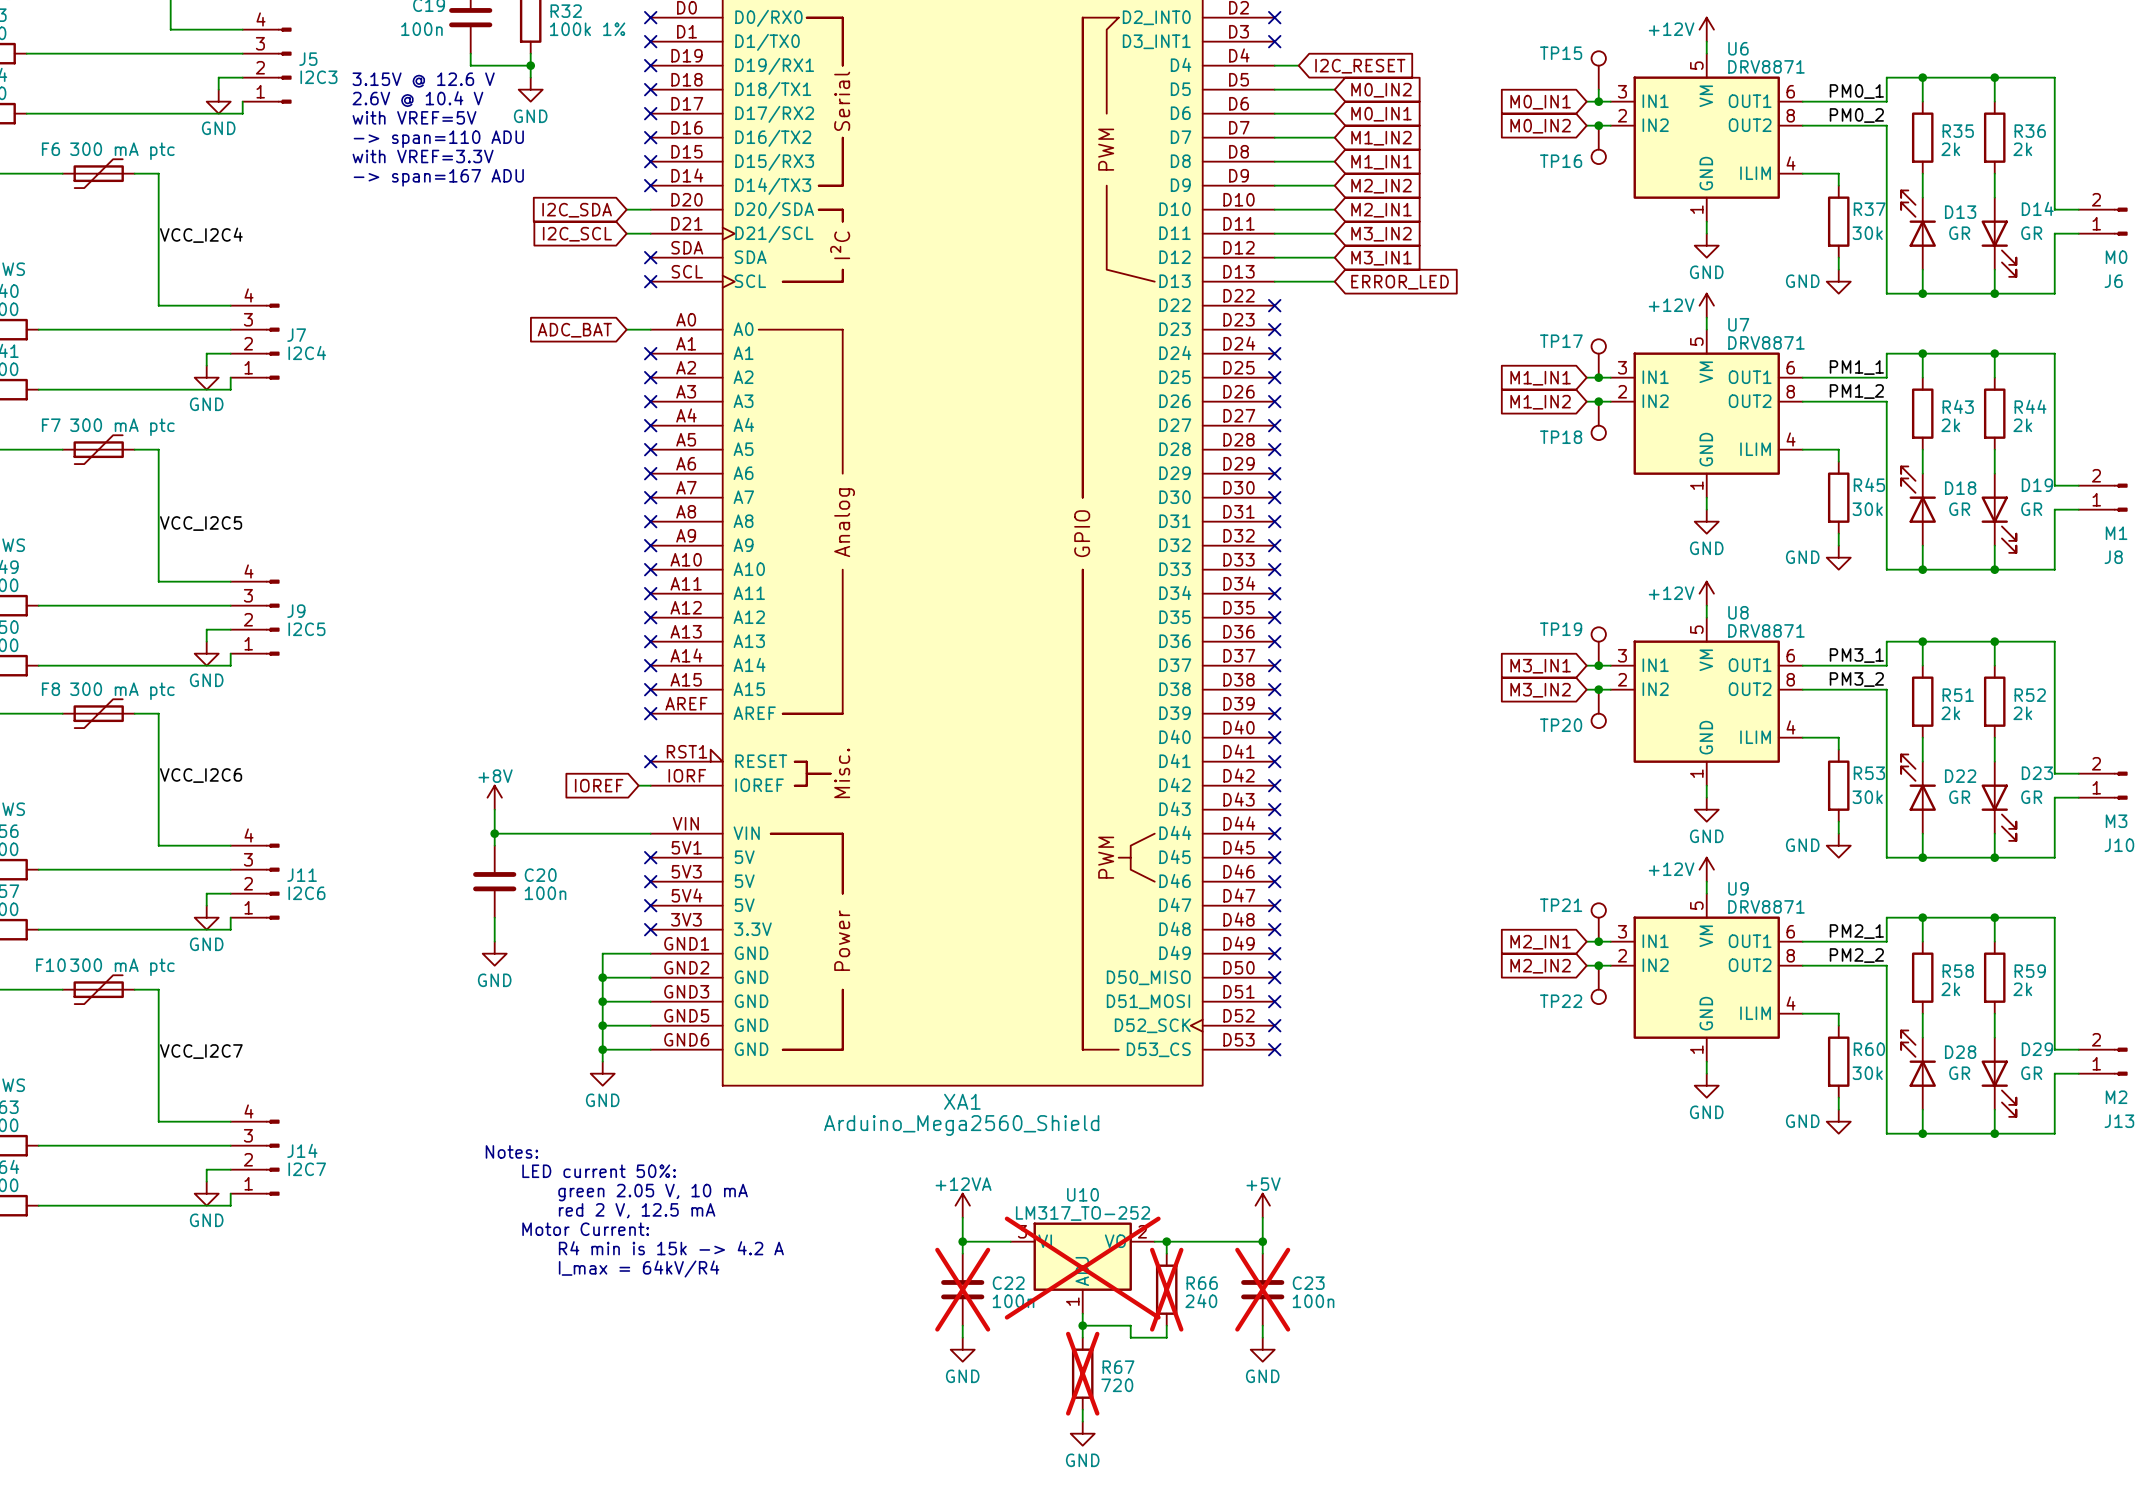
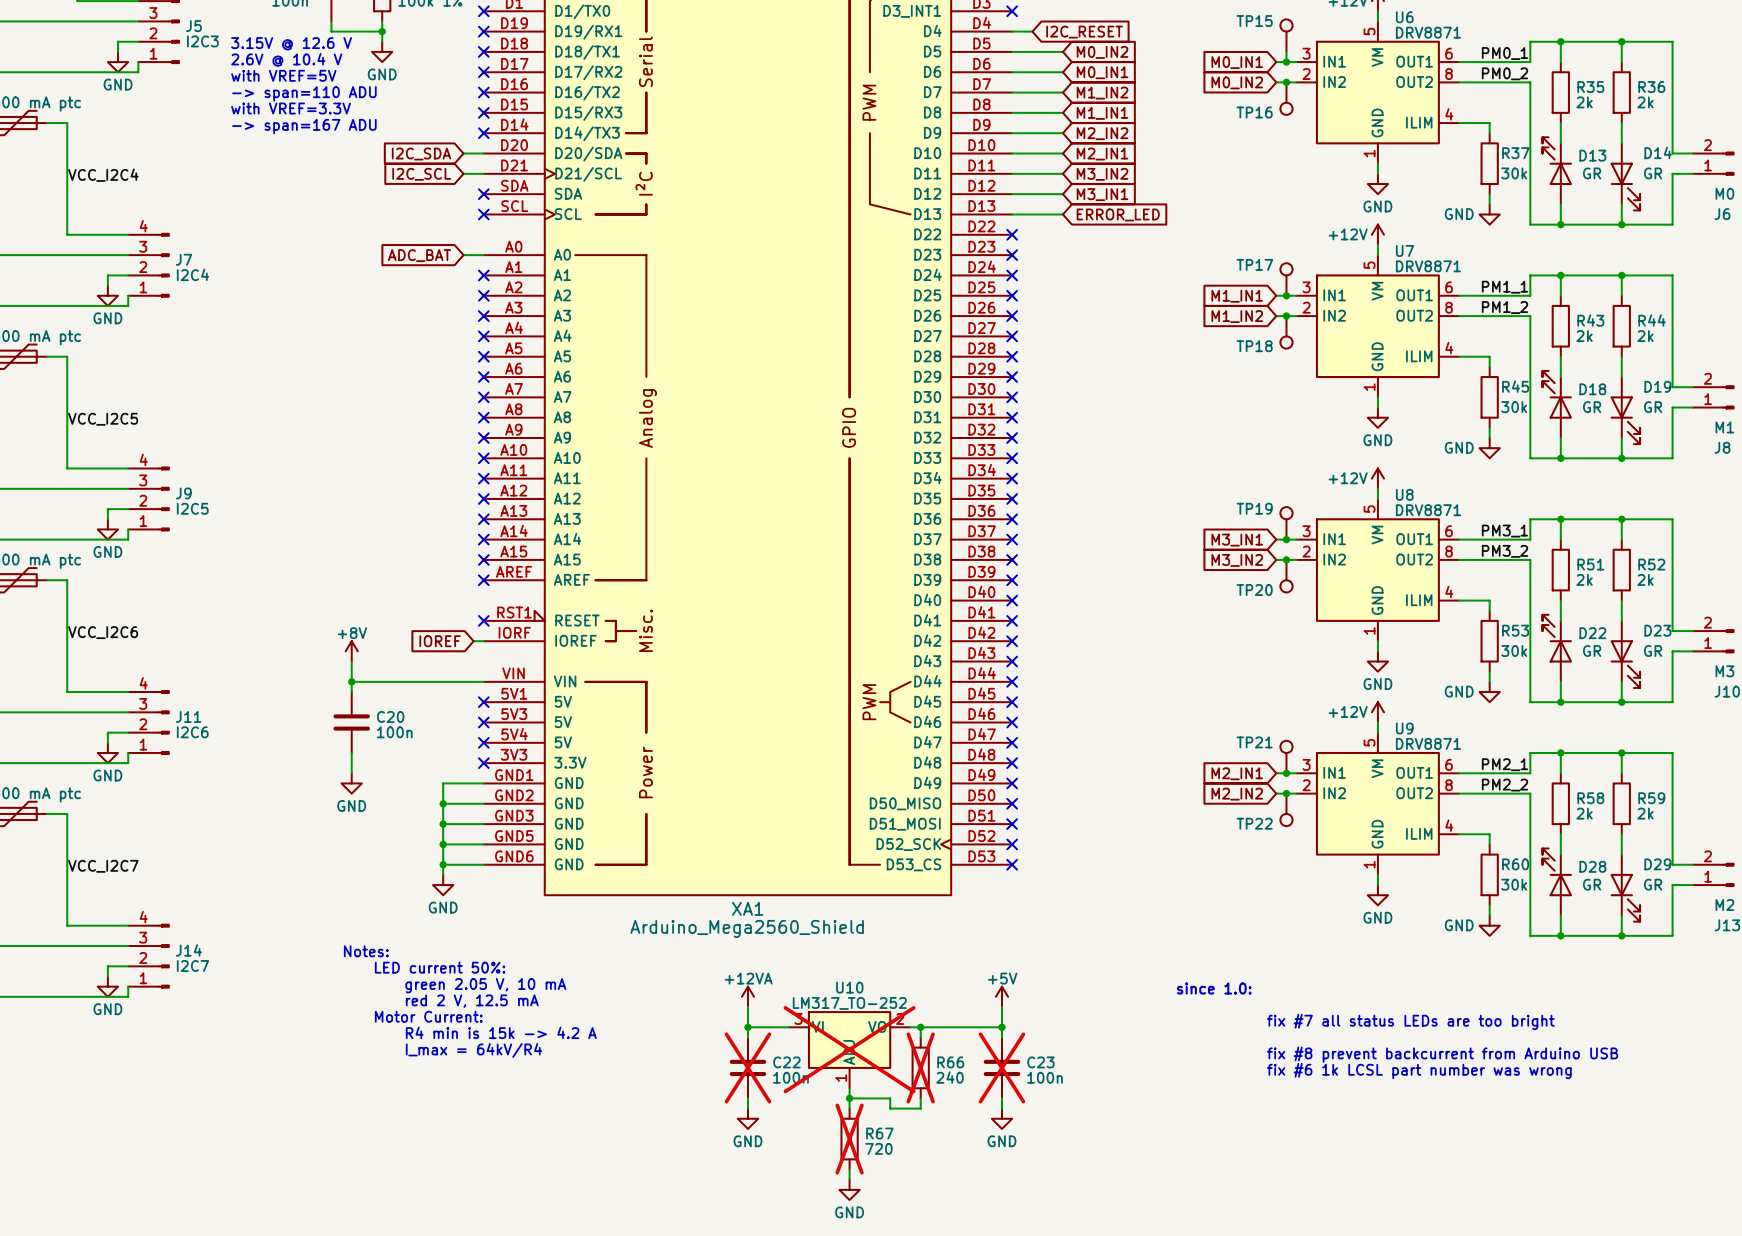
text: none -> since 1.0: (1214, 988)
text: none -> fix #7 all status LEDs are too bright (1410, 1021)
text: none -> fix #8 prevent backcurrent from Arduino USB (1442, 1054)
text: none -> fix #6 1k LCSL part number was wrong (1419, 1070)

